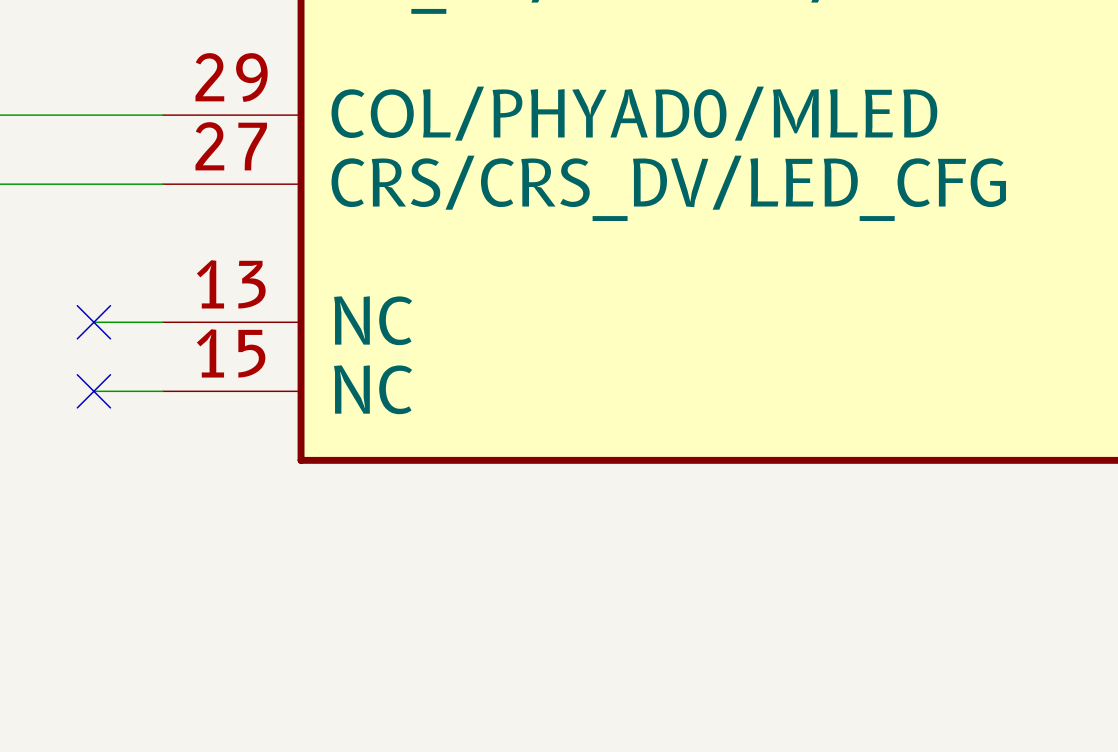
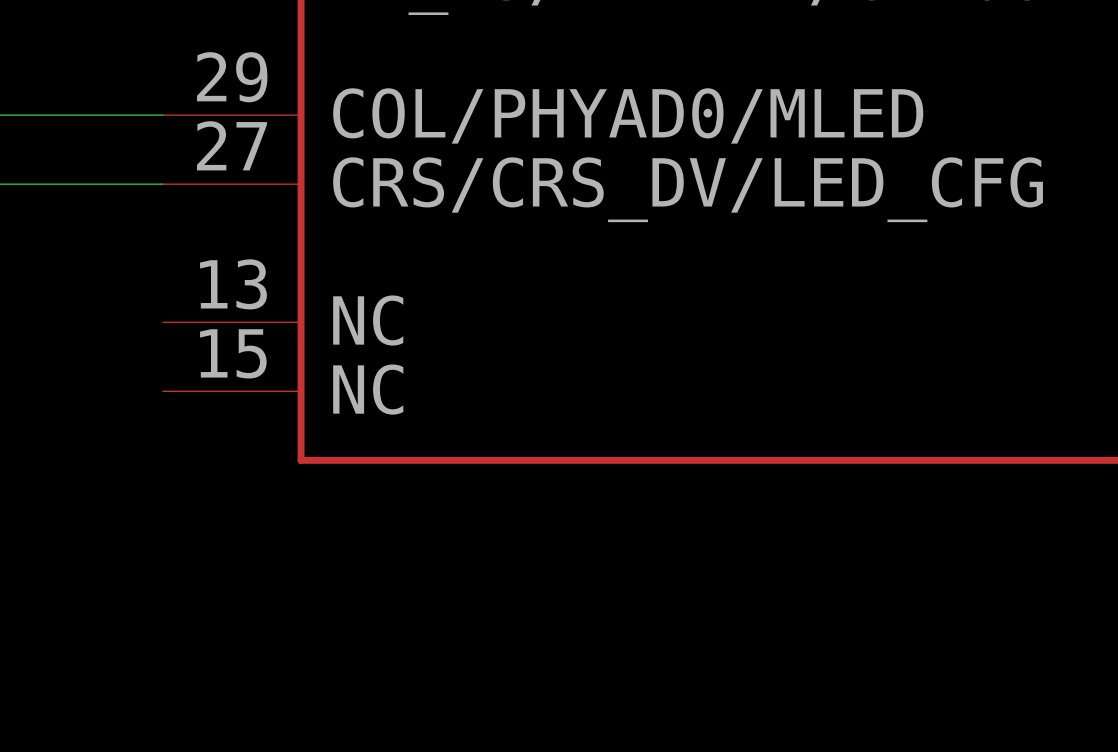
wire: (93, 322) (162, 322) -> none
no-connect mark: (93, 322) -> none
wire: (93, 391) (162, 391) -> none
no-connect mark: (93, 391) -> none

